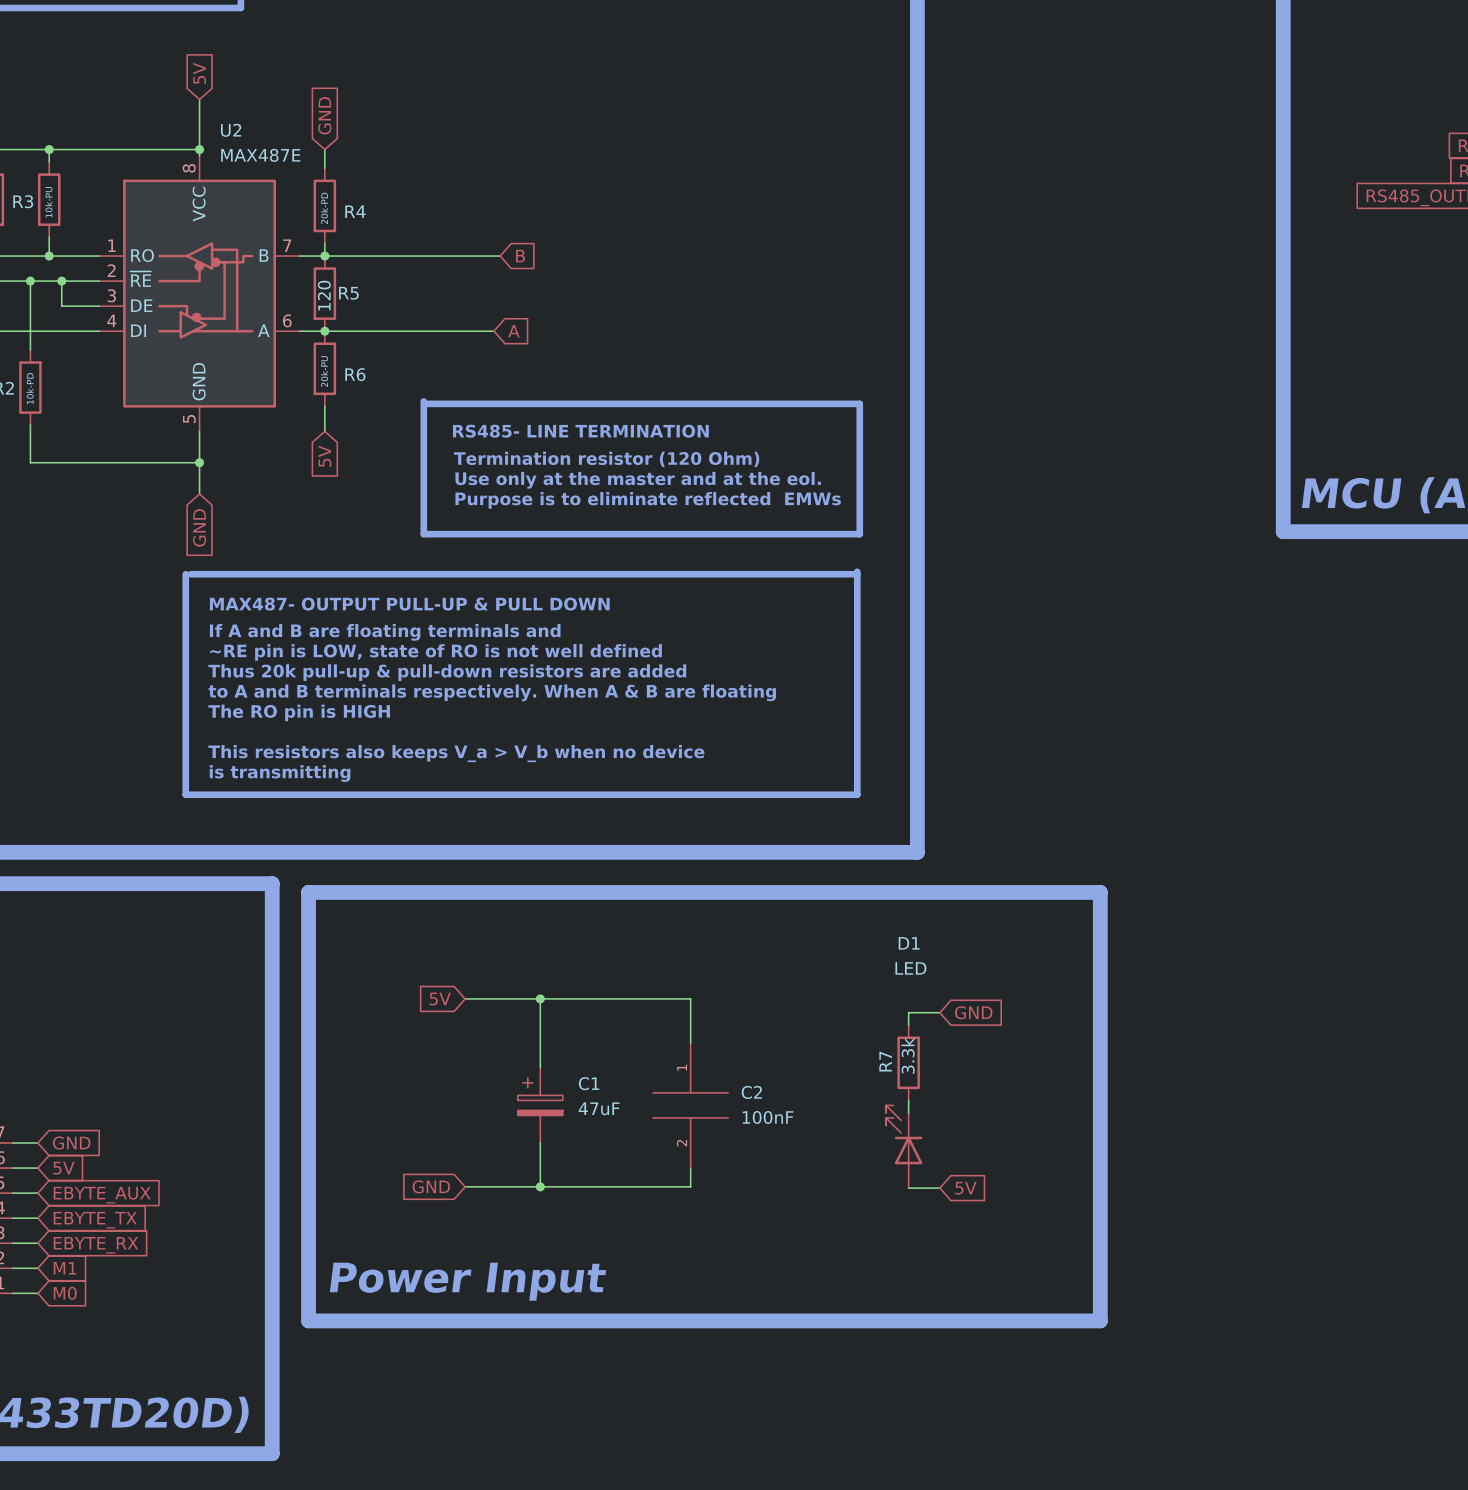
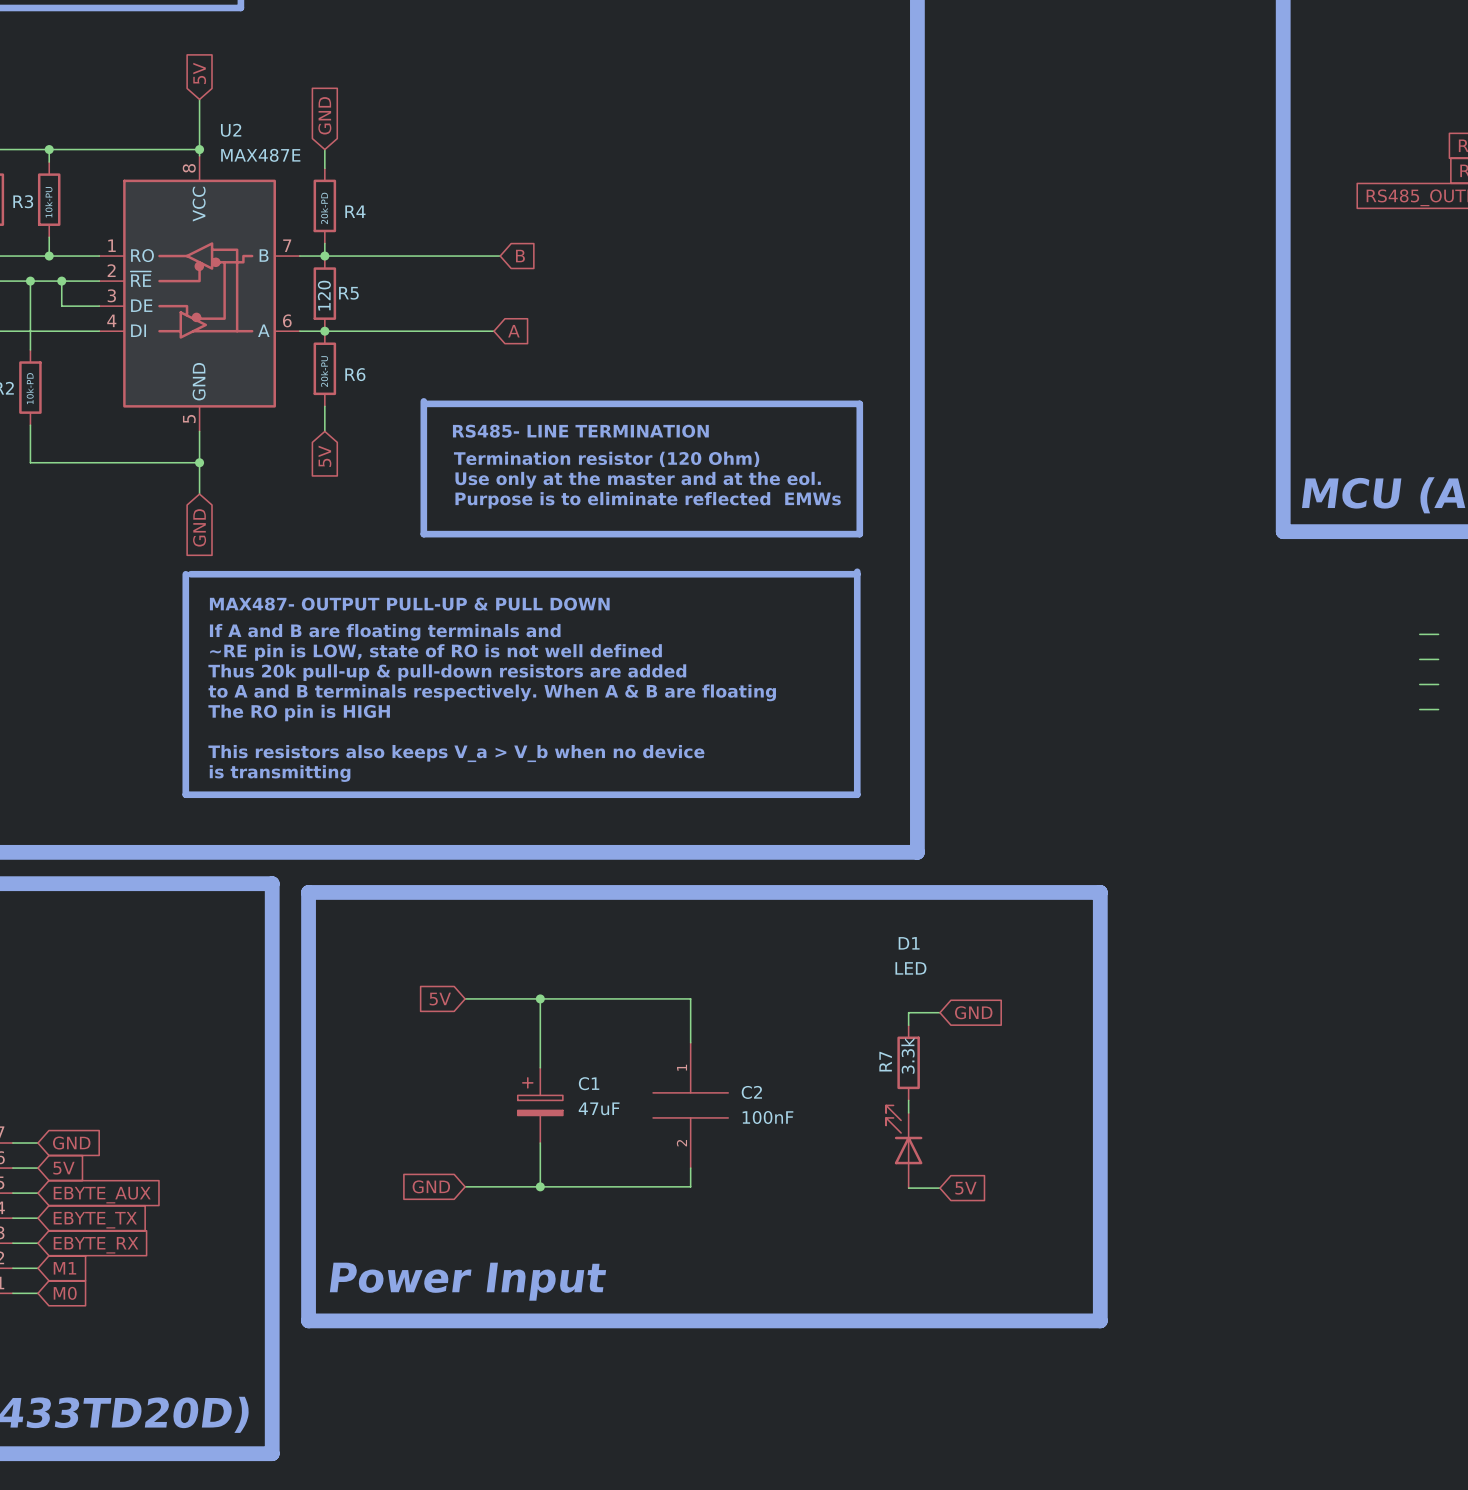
wire: none -> (1419, 634) (1438, 634)
wire: none -> (1419, 659) (1438, 659)
wire: none -> (1419, 684) (1438, 684)
wire: none -> (1419, 709) (1438, 709)

